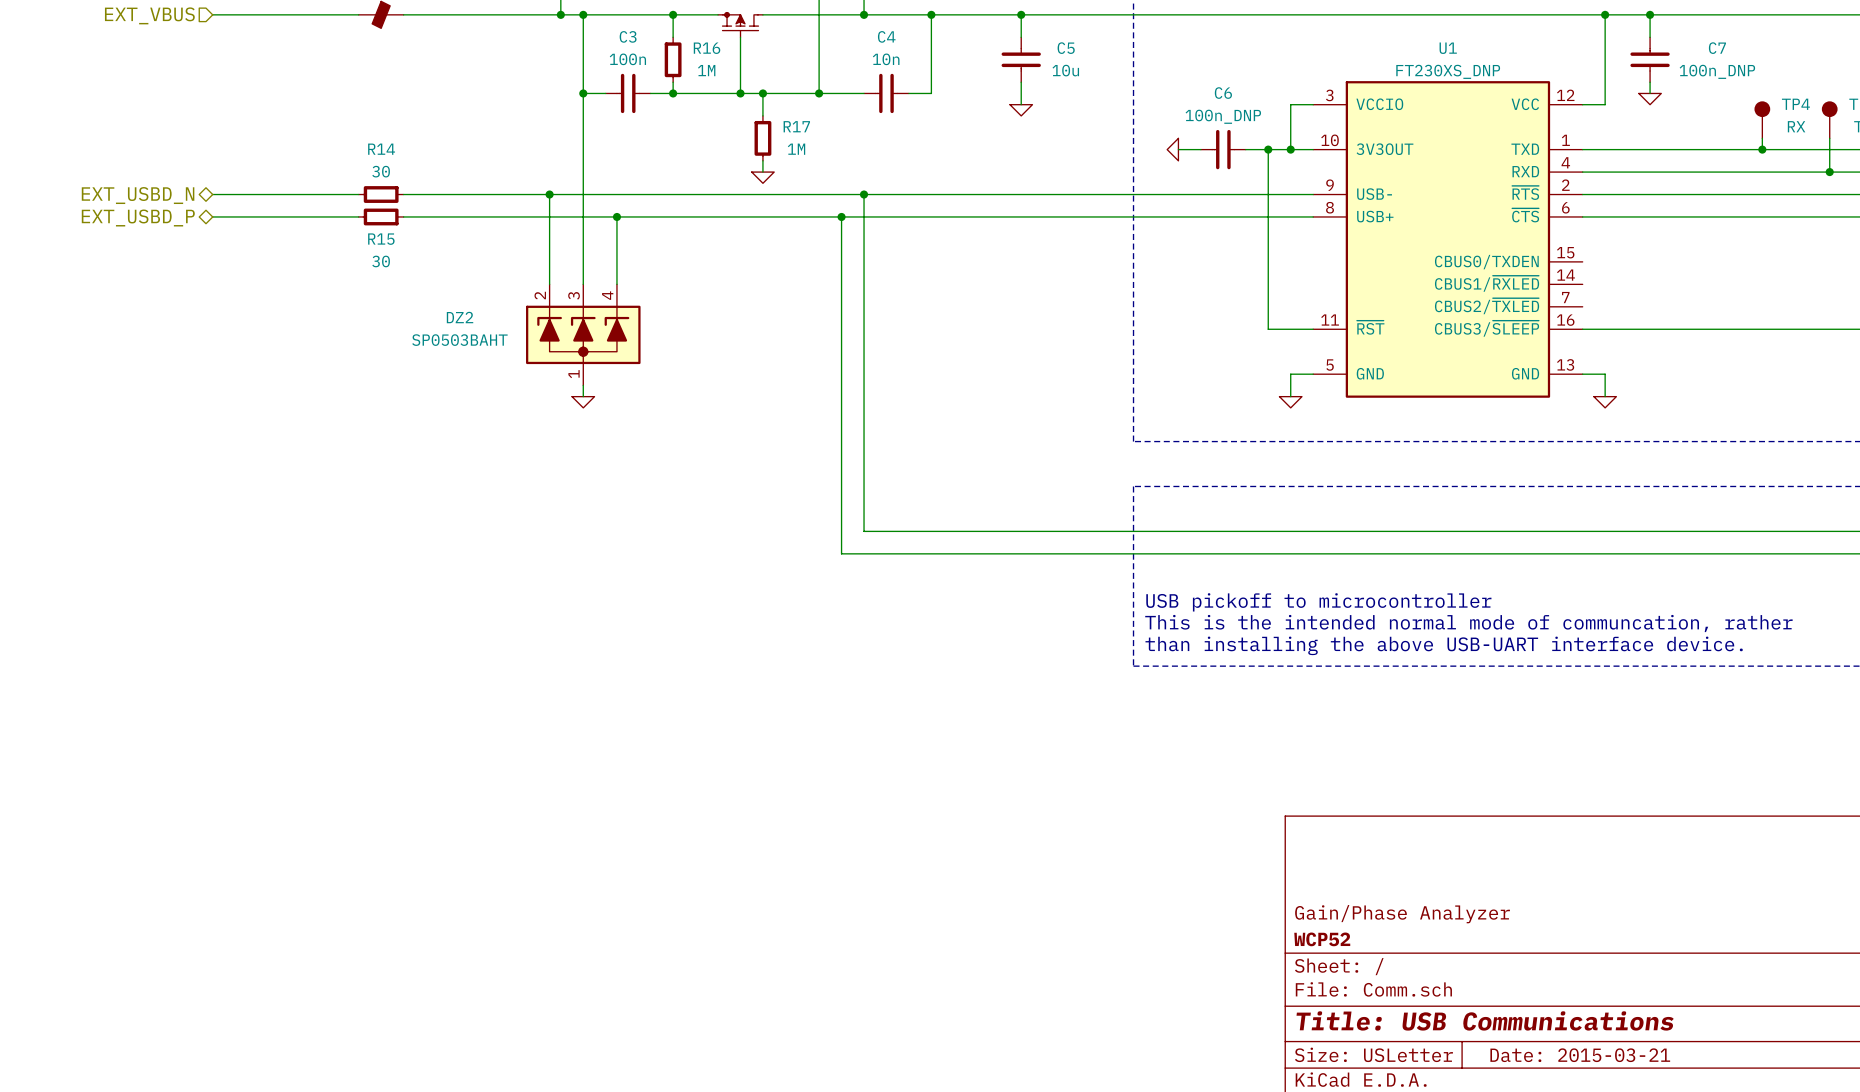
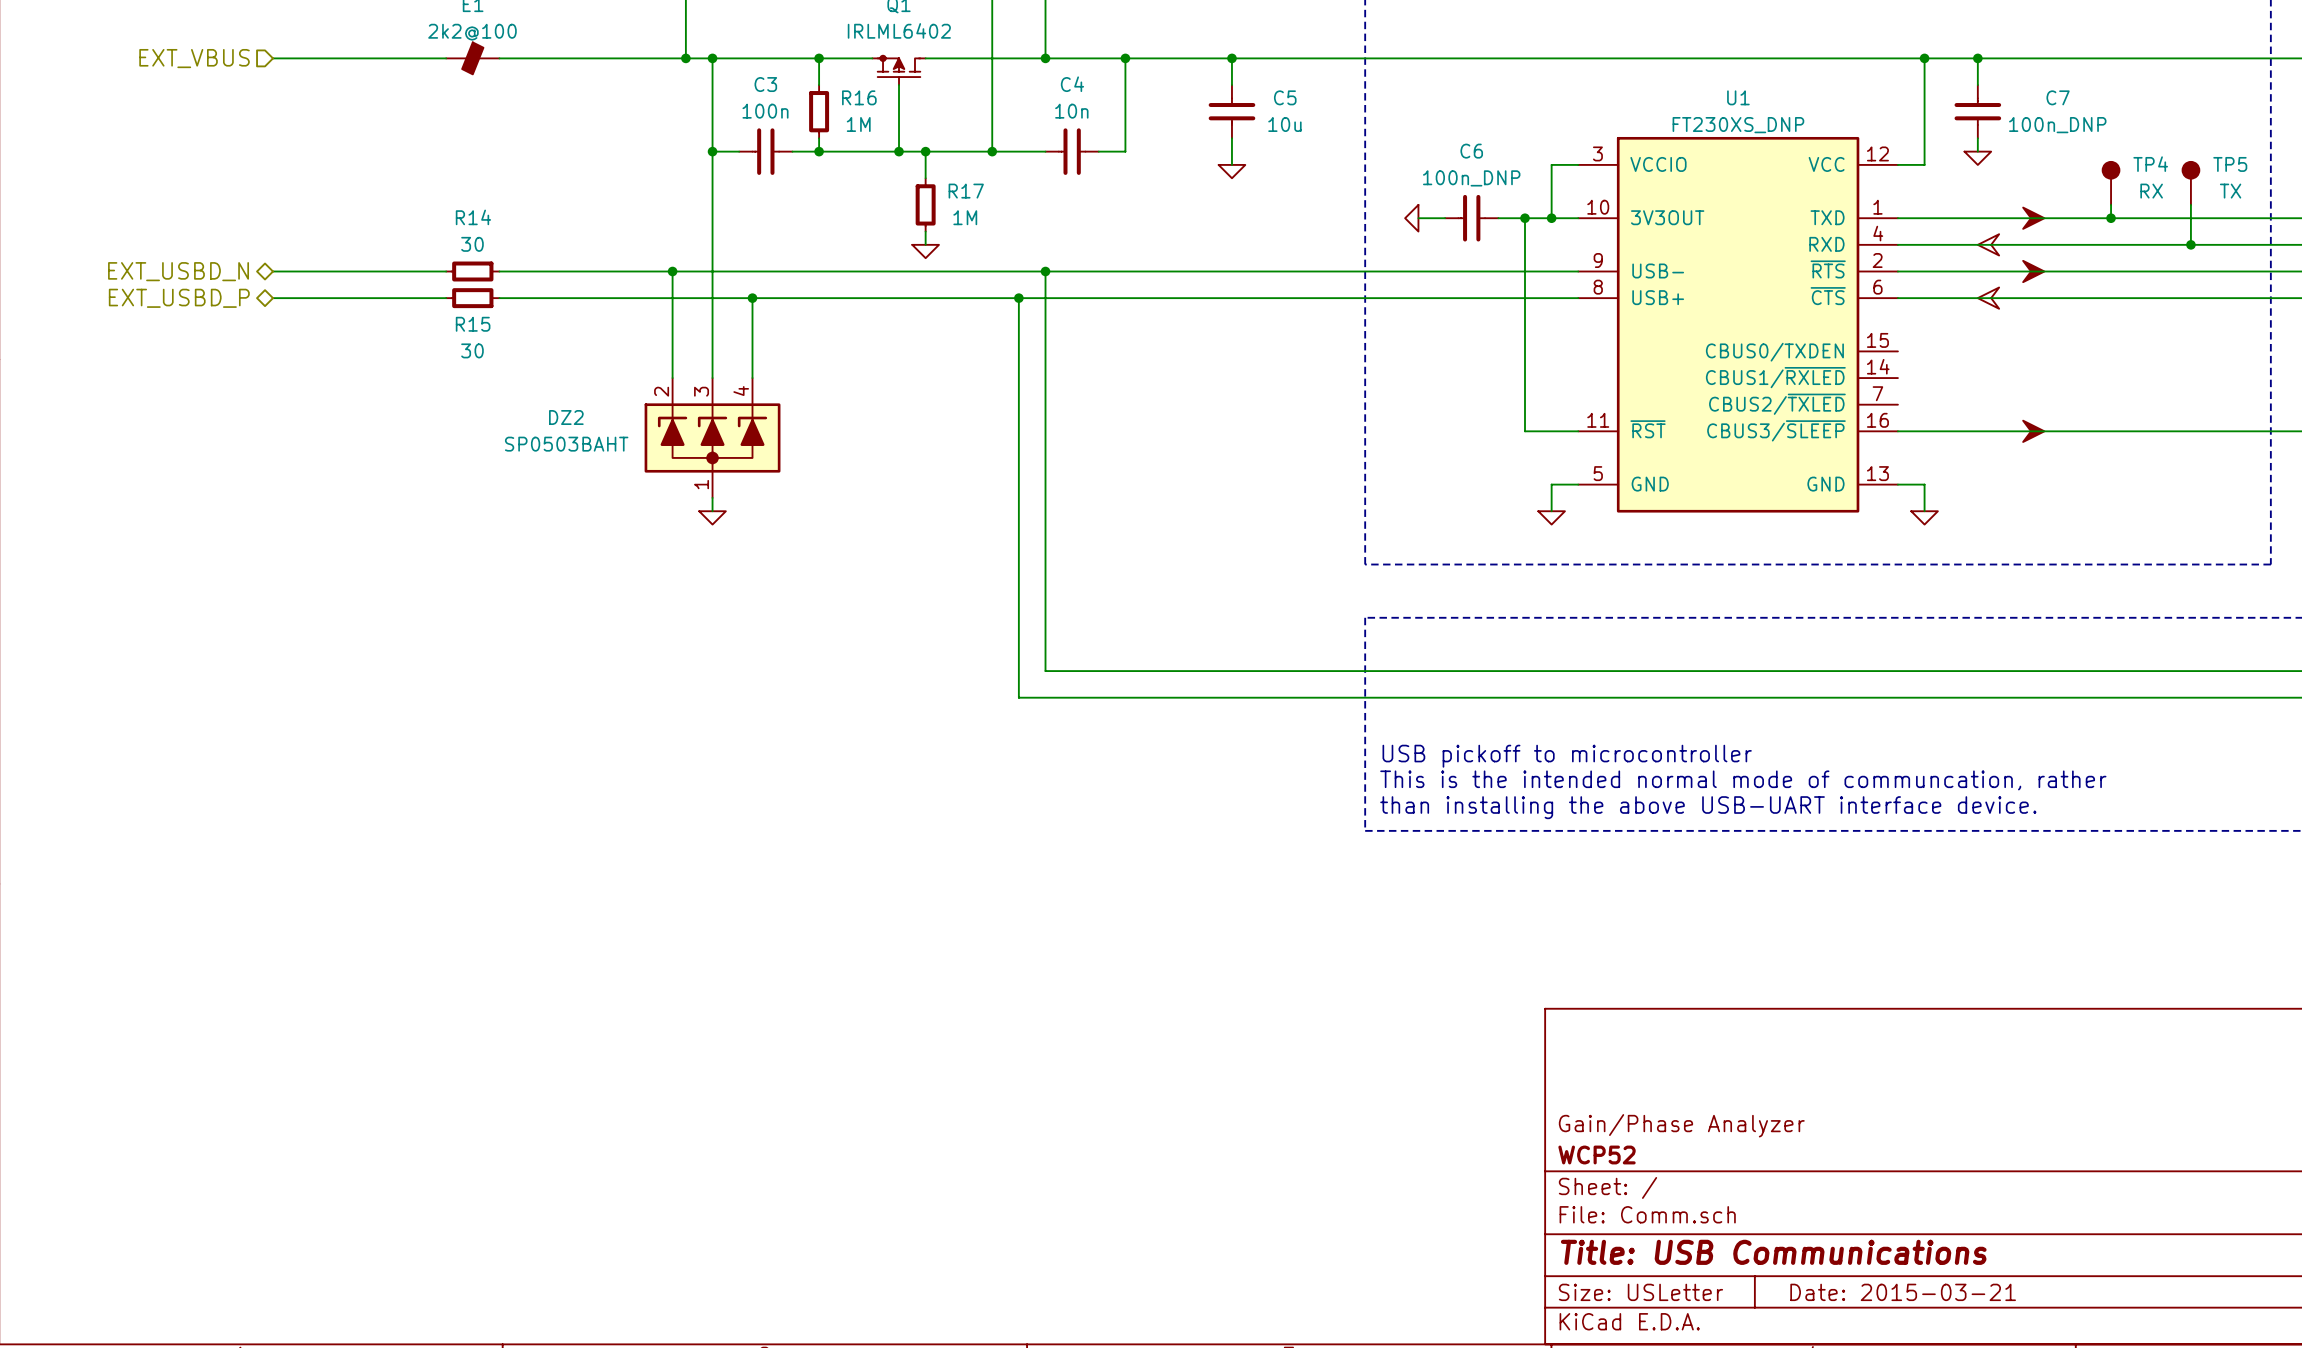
power symbol: none -> (2033, 218)
power symbol: none -> (1988, 244)
power symbol: none -> (2033, 271)
power symbol: none -> (1988, 298)
power symbol: none -> (2033, 431)

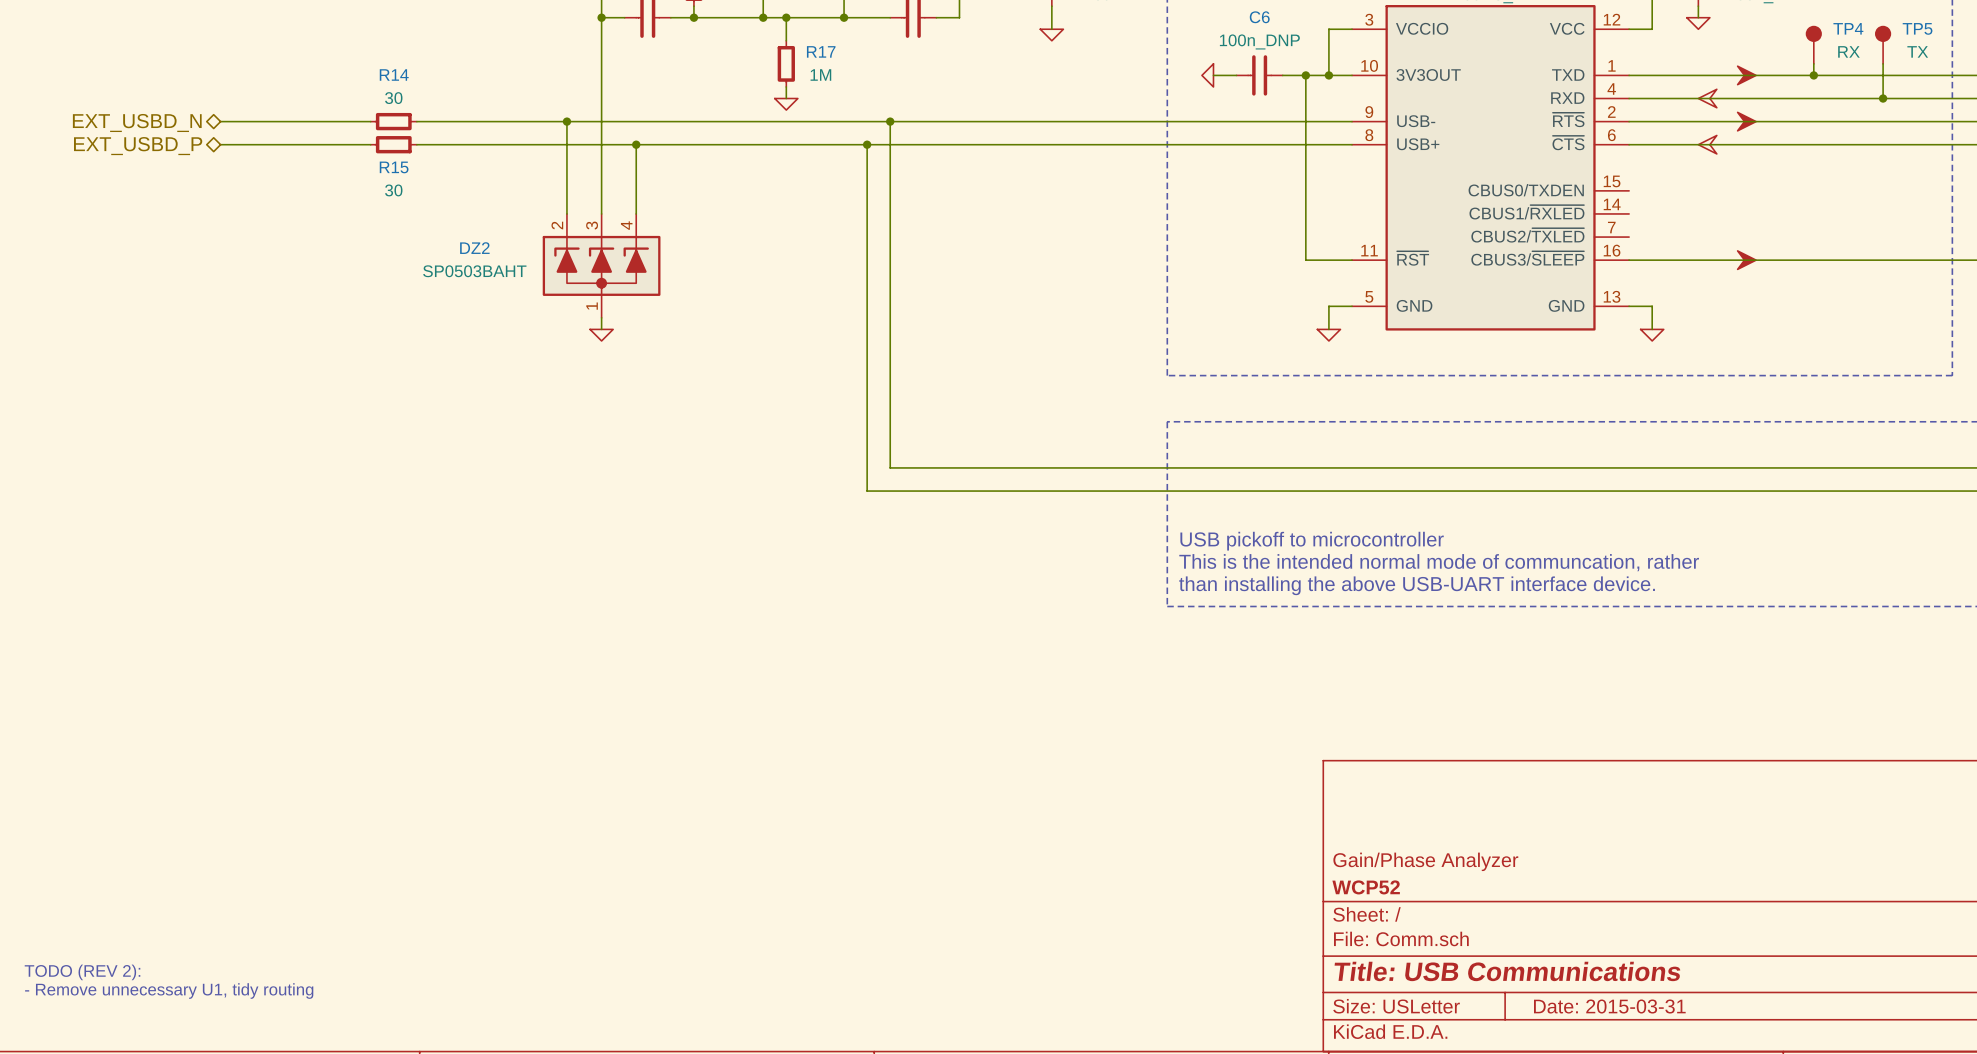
text: none -> TODO (REV 2): (82, 972)
text: none -> - Remove unnecessary U1, tidy routing (169, 991)
title block: Date: 2015-03-21 (1903, 1292) -> Date: 2015-03-31 (1609, 1006)

